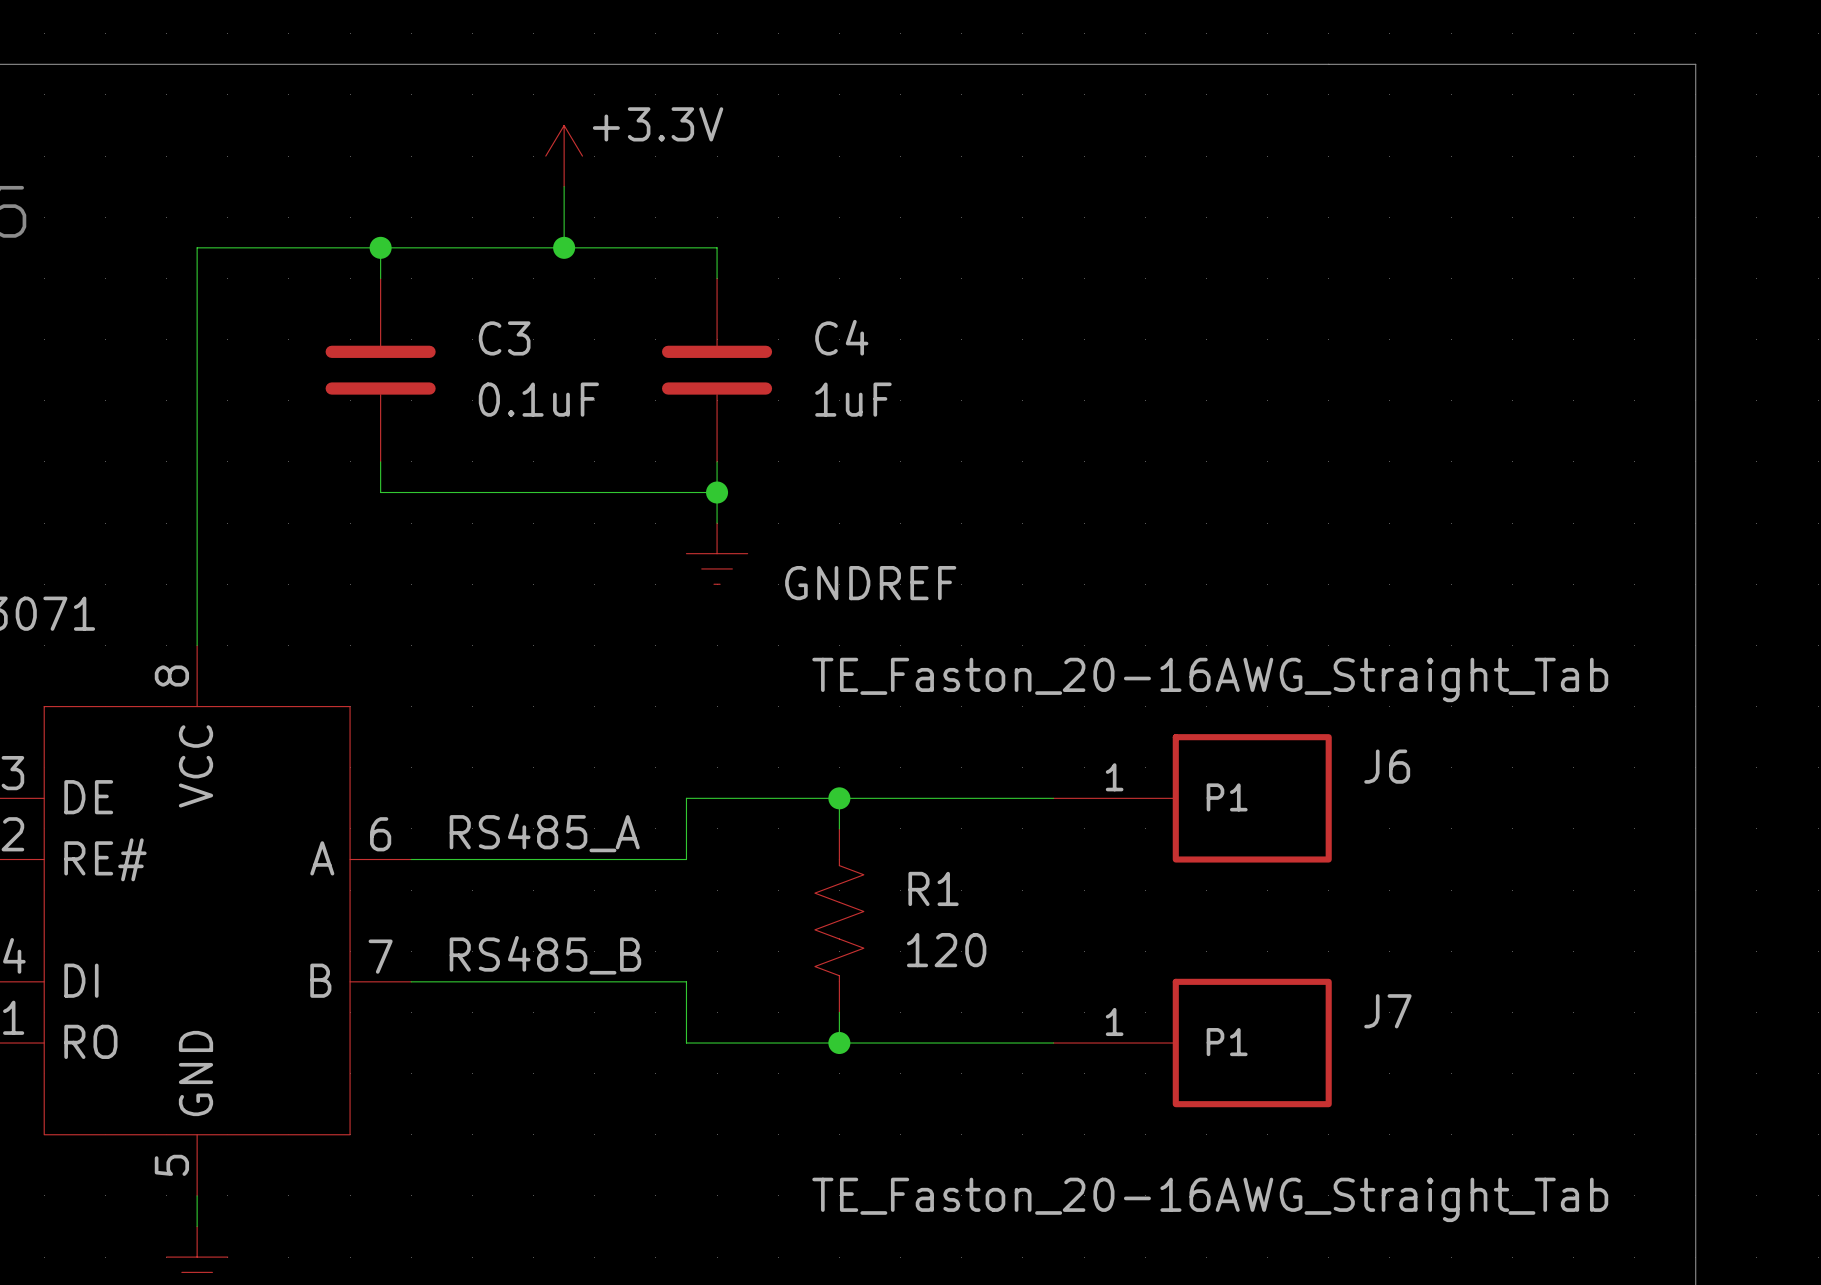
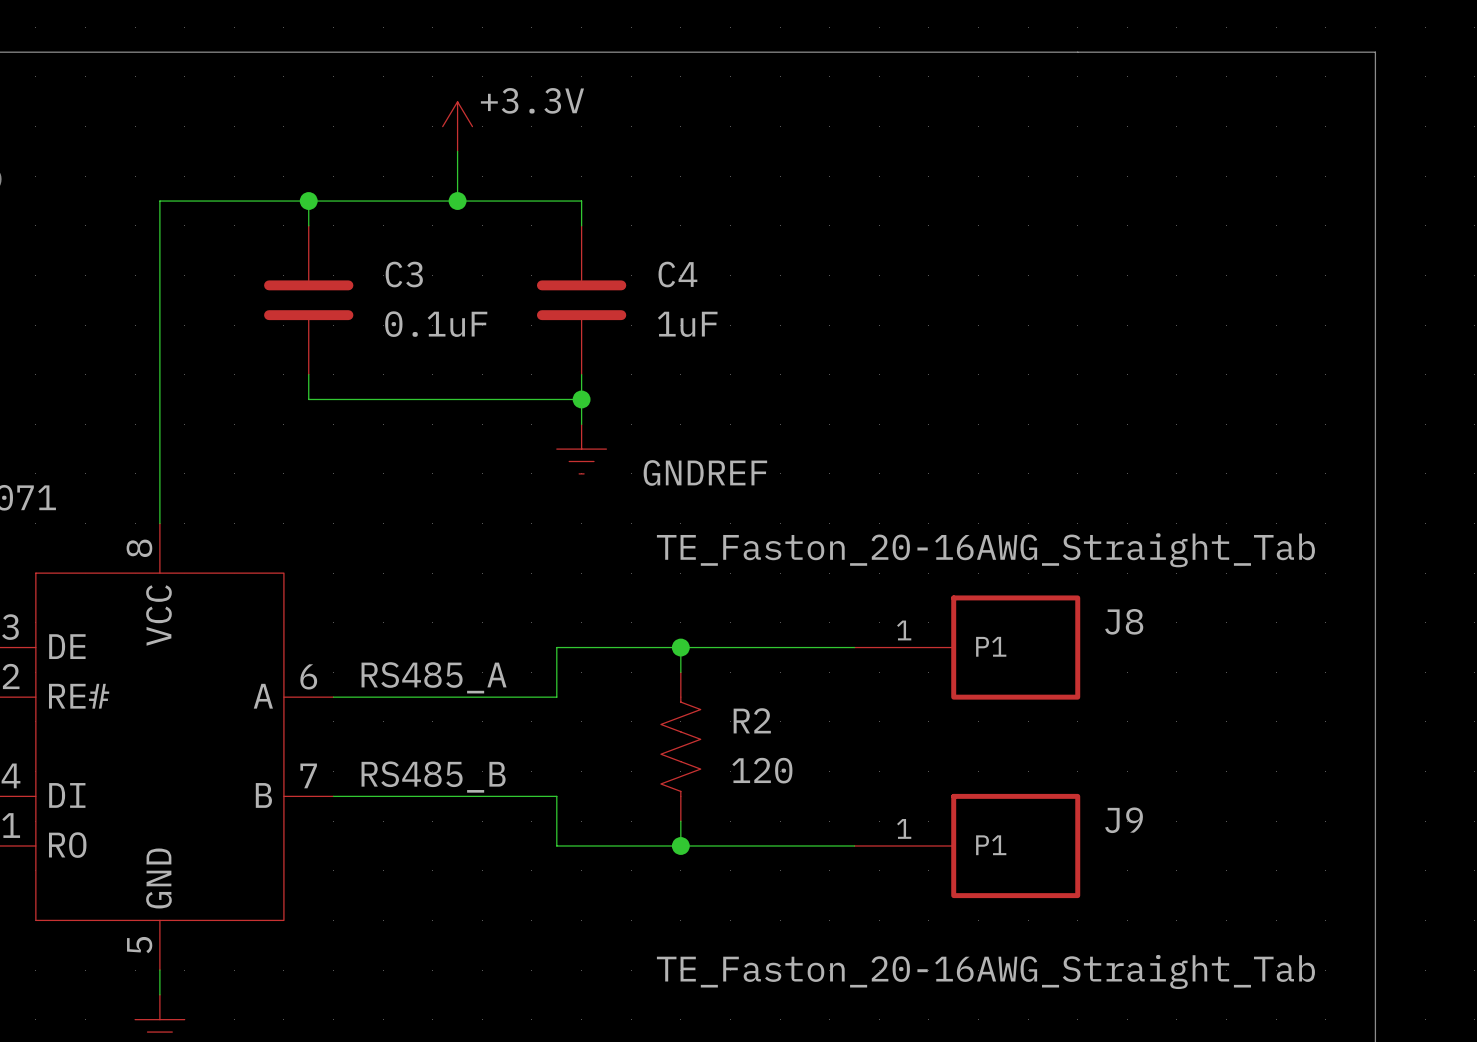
J6 name: J6 (1387, 766) -> J8 (1124, 621)
R1 name: R1 (933, 888) -> R2 (752, 720)
J7 name: J7 (1387, 1011) -> J9 (1124, 820)

